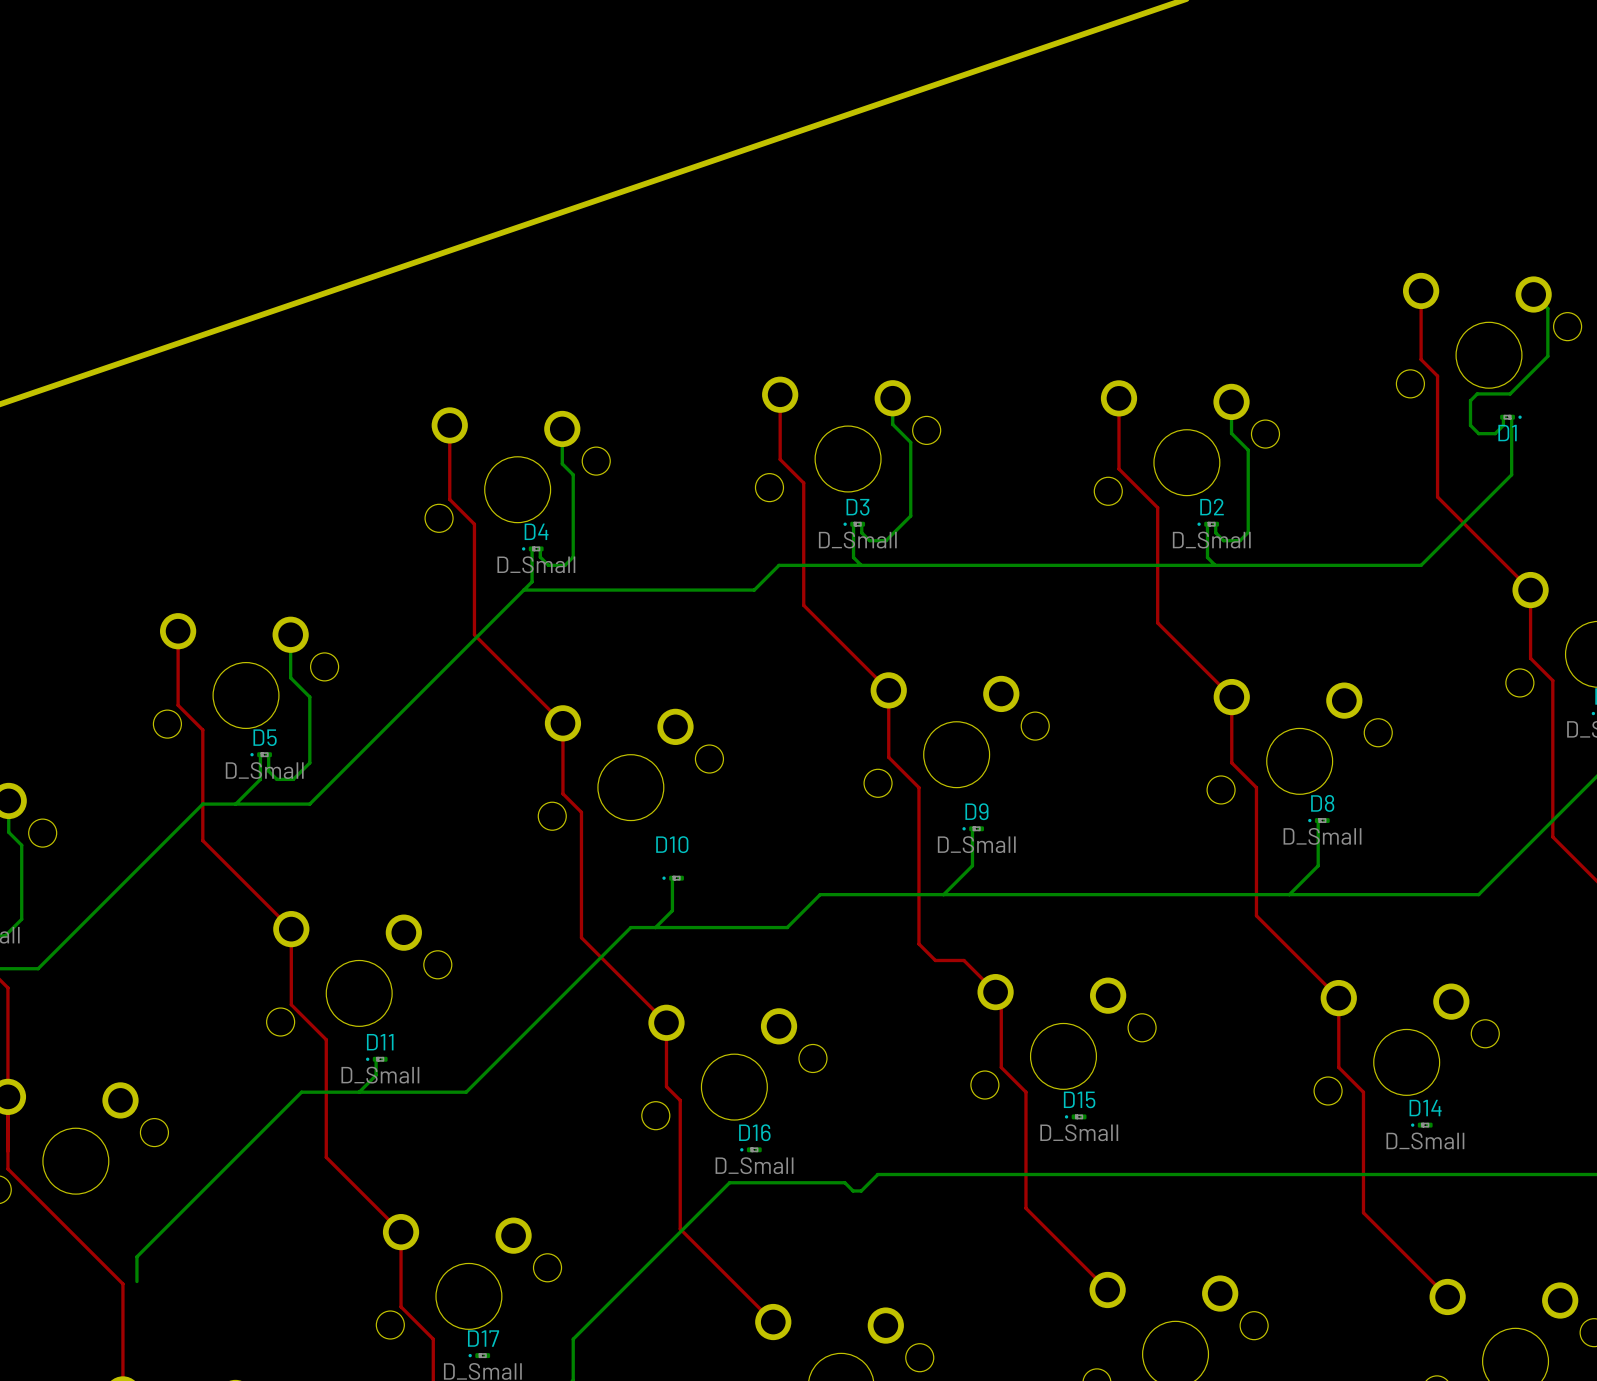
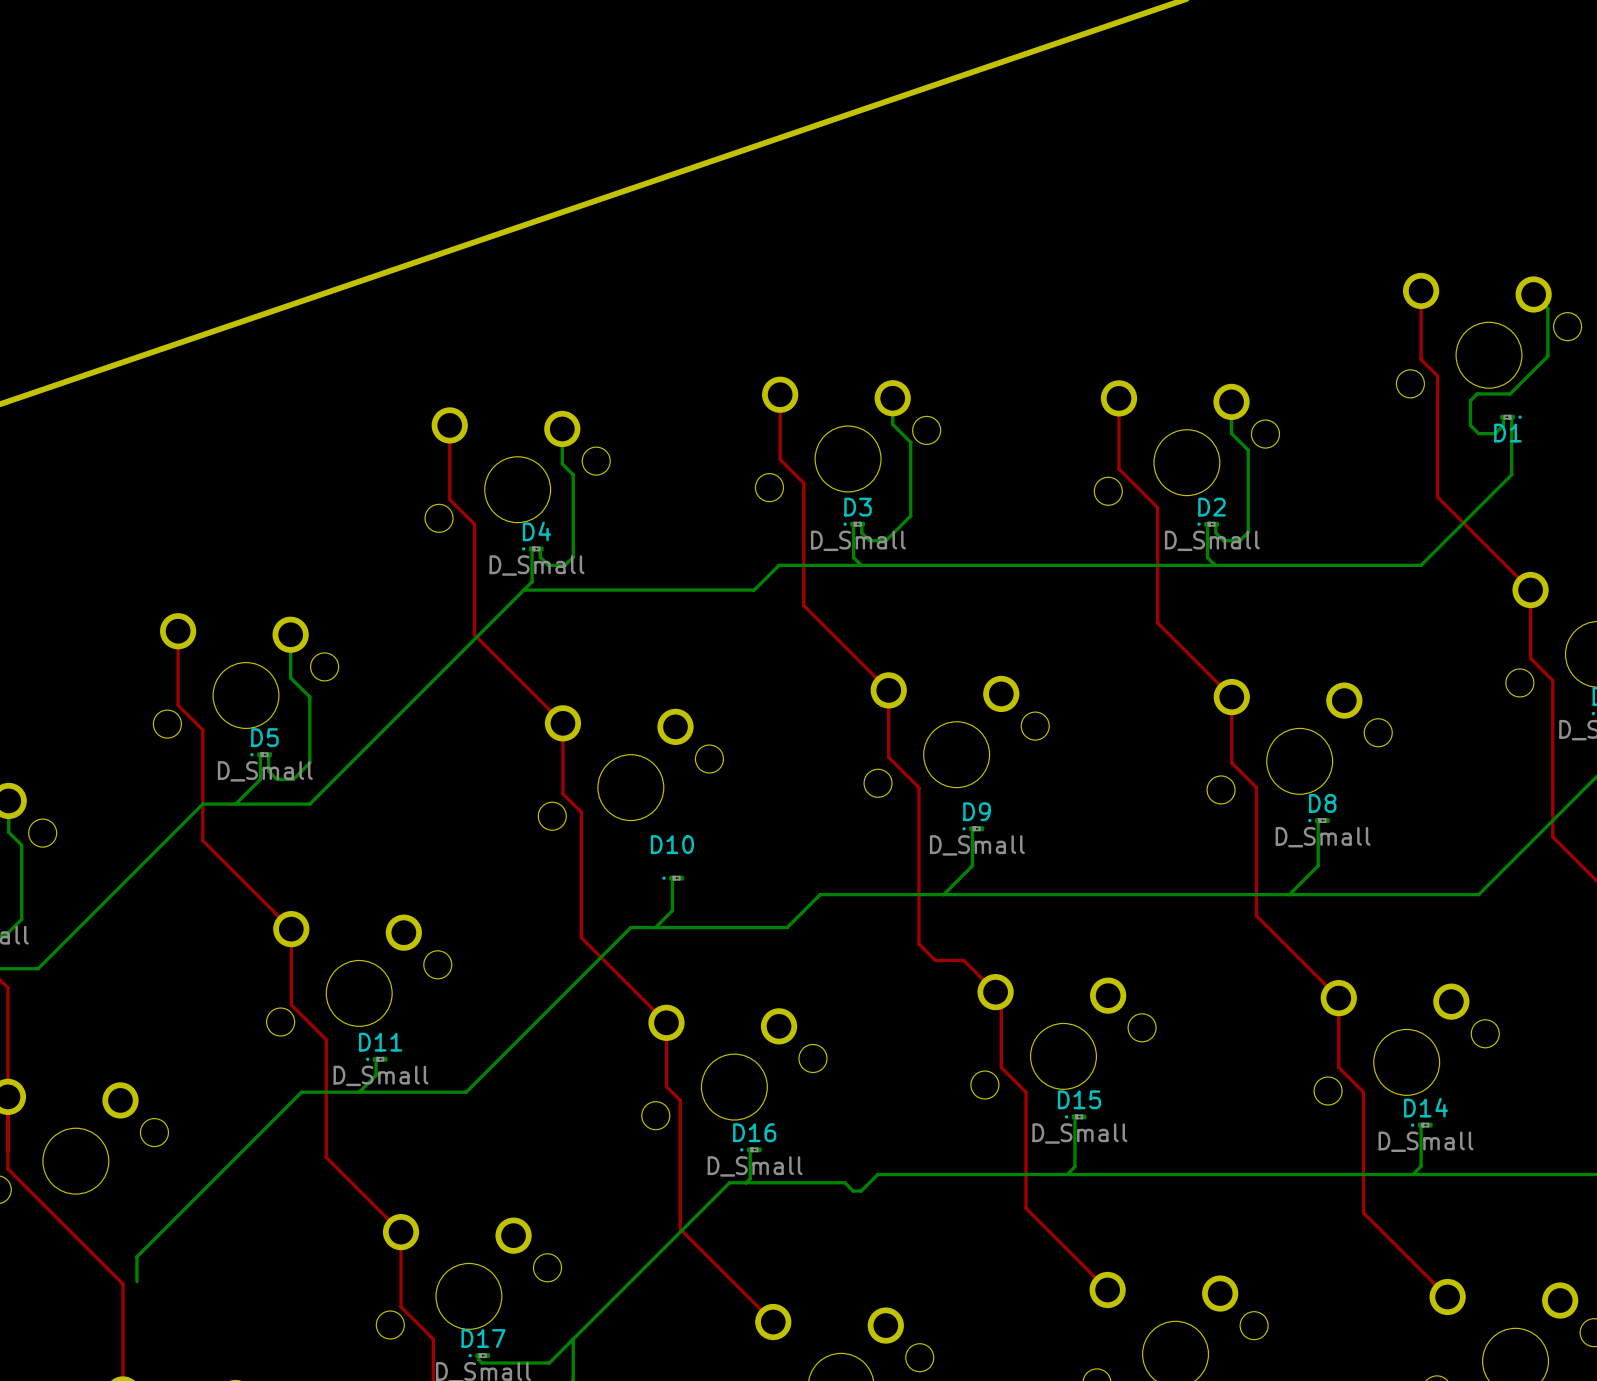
bottom track: none -> (1074, 1116) (1074, 1166) (1067, 1174)
bottom track: none -> (1421, 1125) (1421, 1166) (1412, 1174)
bottom track: none -> (750, 1149) (750, 1178) (746, 1182)
bottom track: none -> (573, 1339) (549, 1363) (482, 1363) (478, 1359) (478, 1355)

